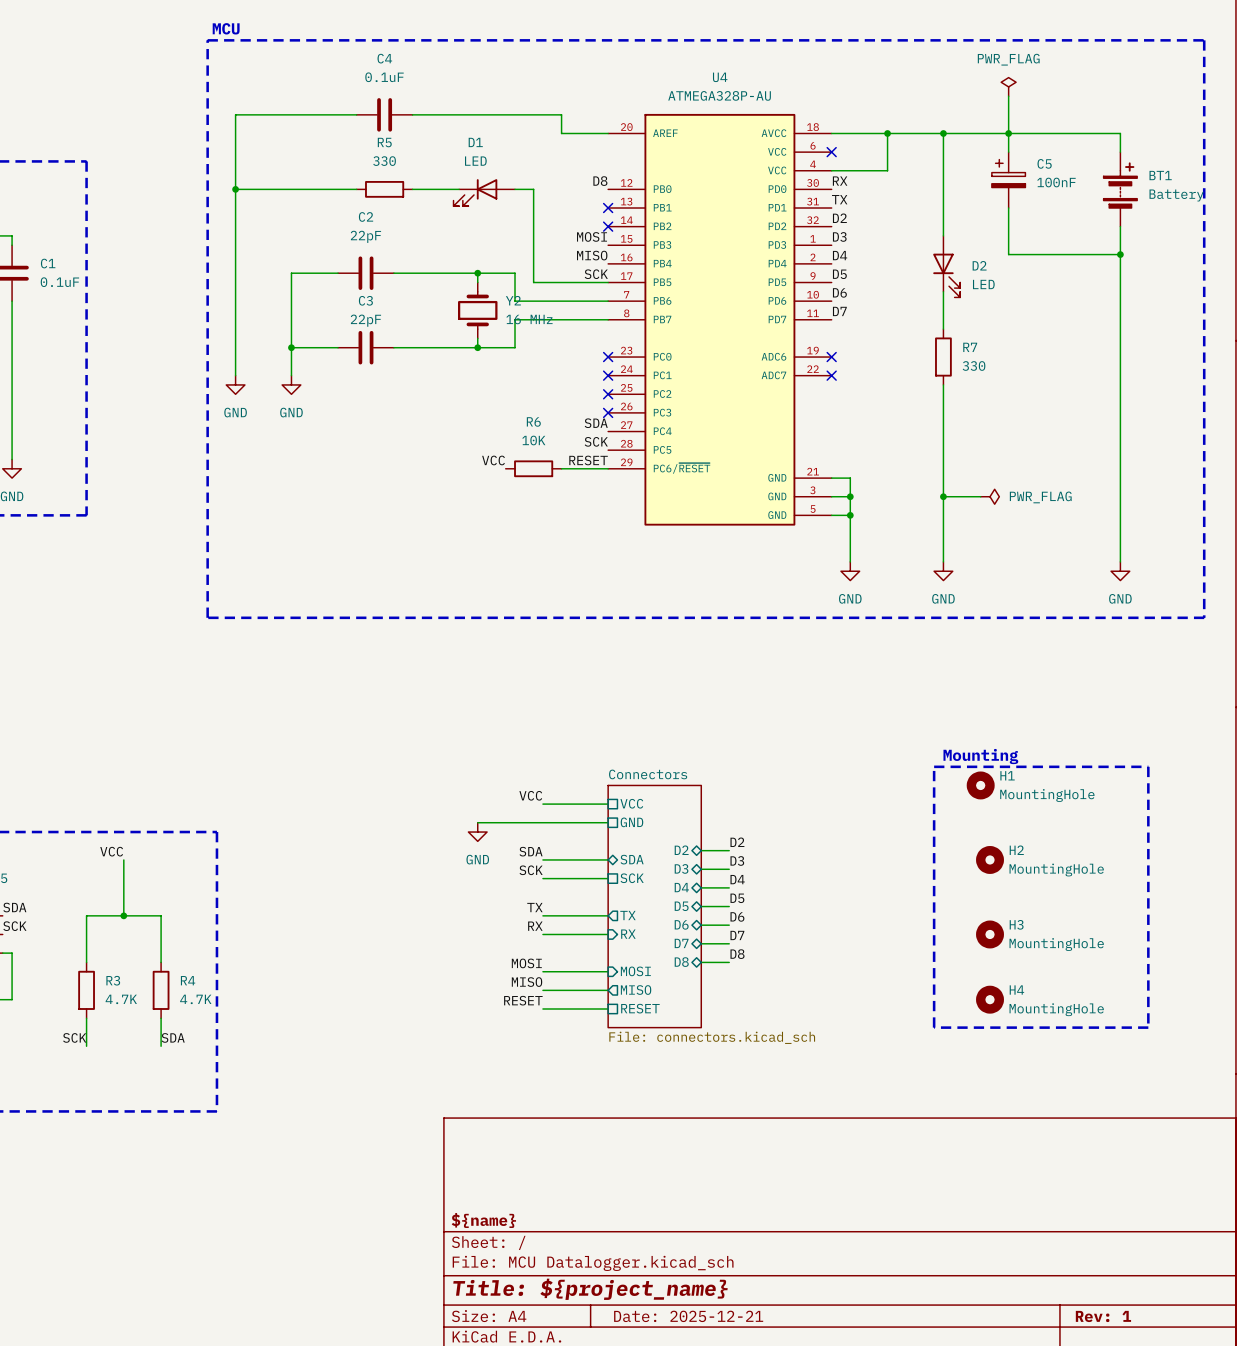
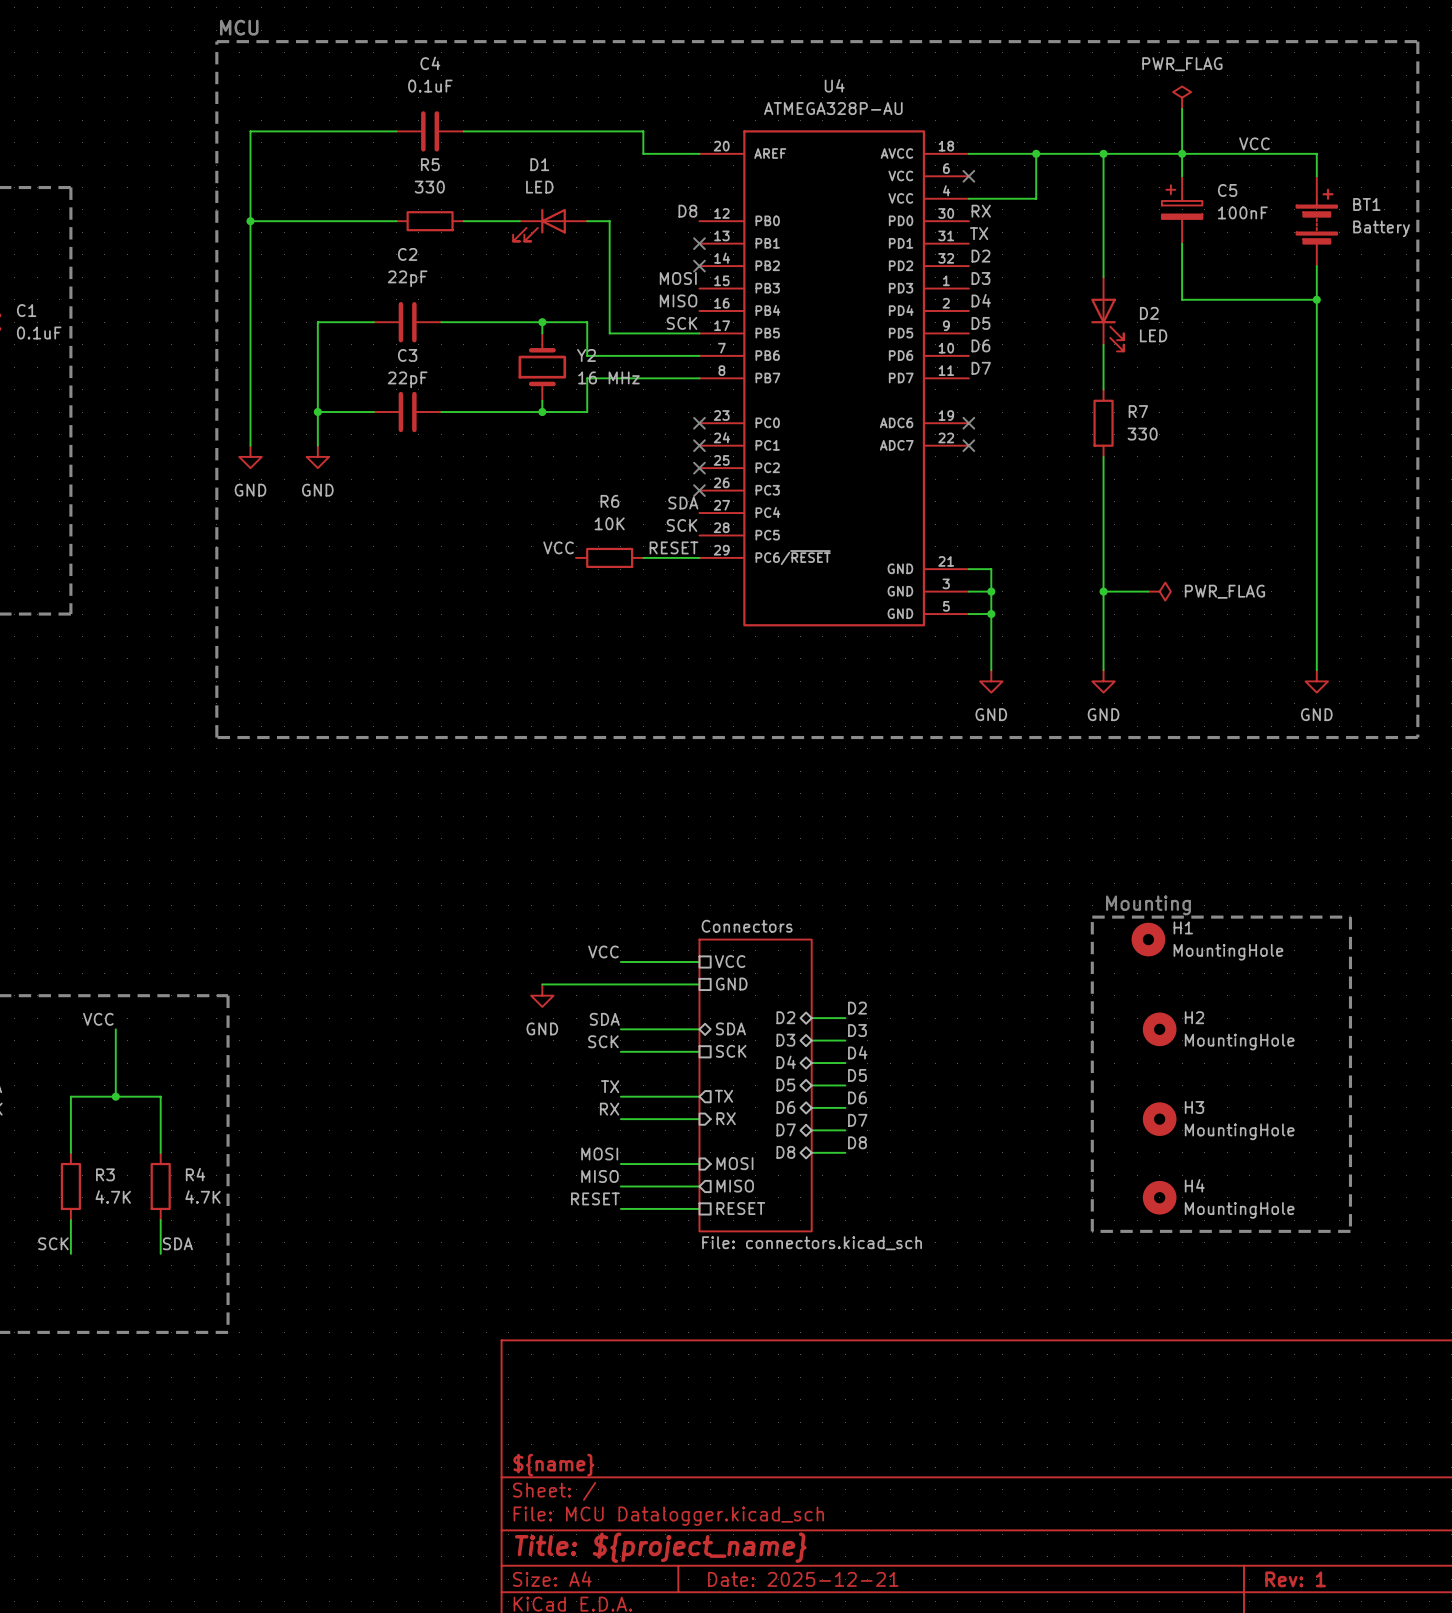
label: none -> VCC (1254, 143)

